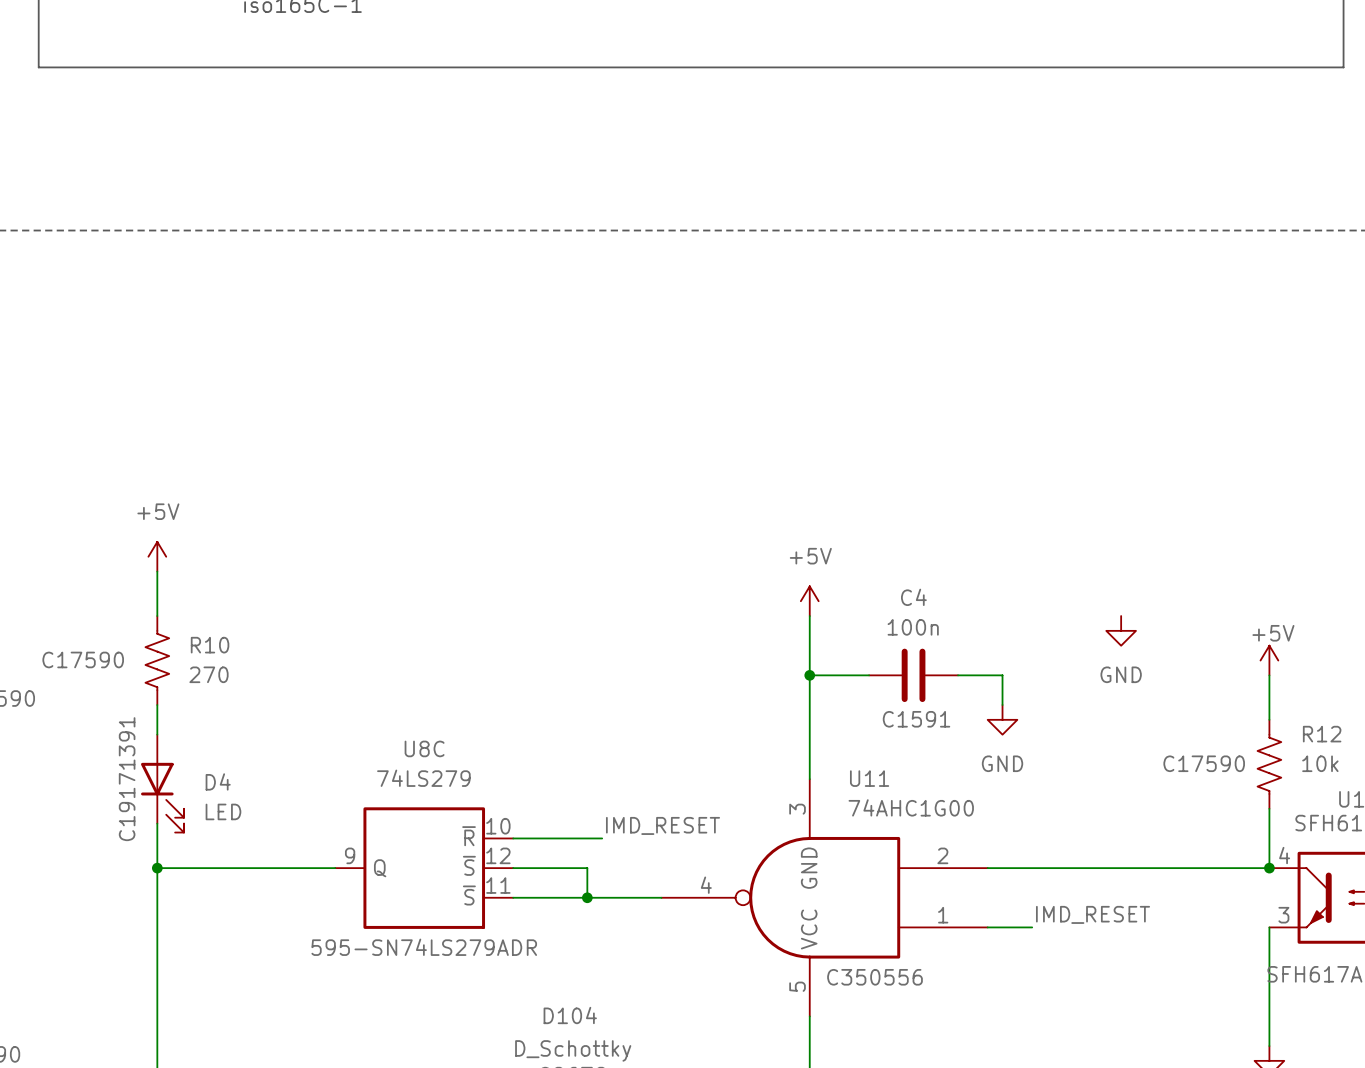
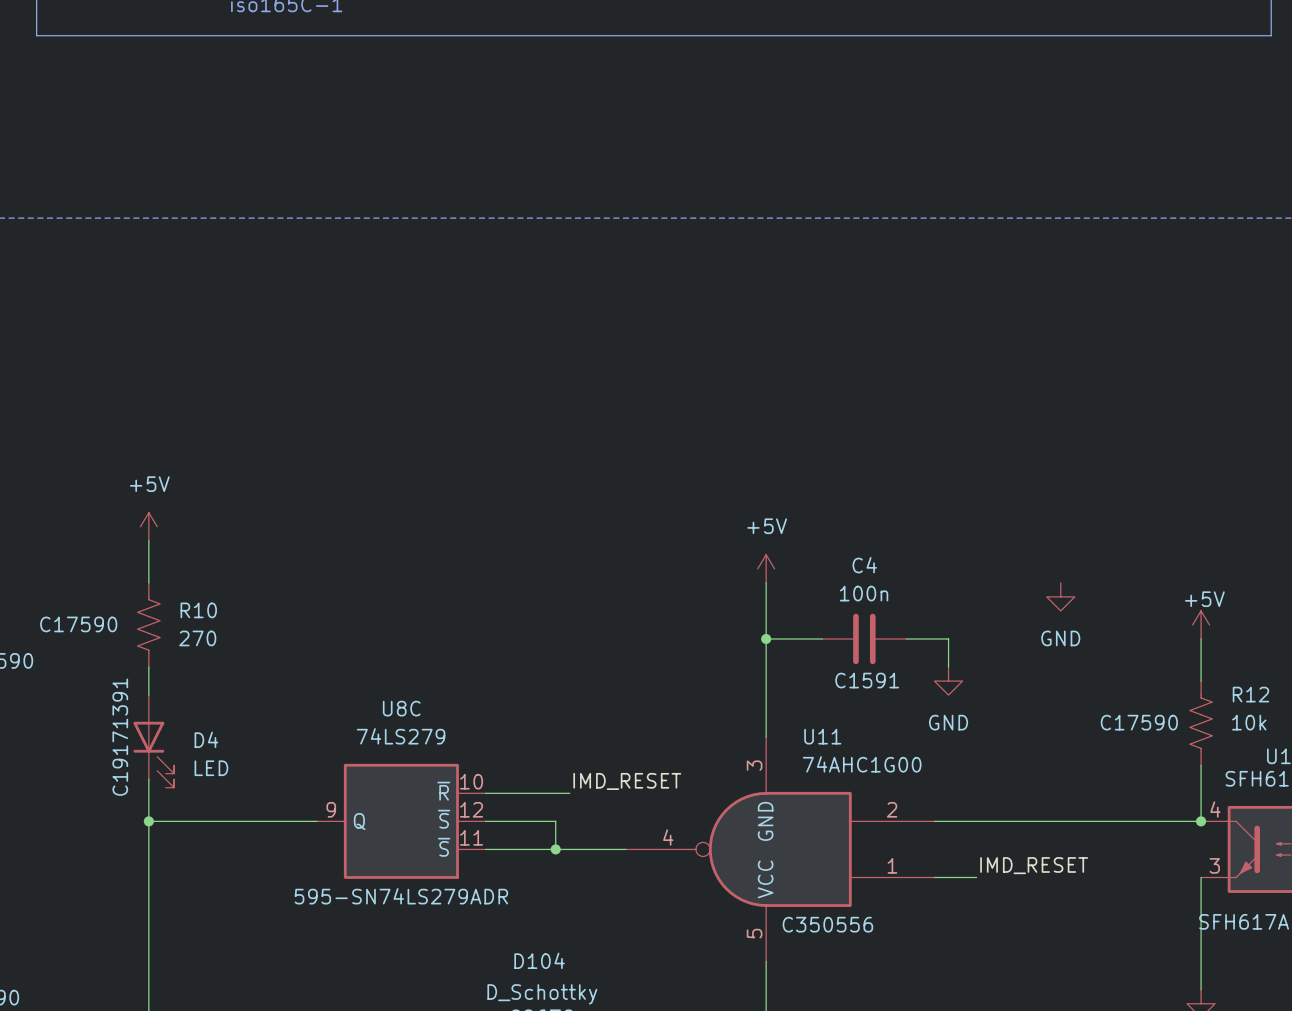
line: (38, 37) (38, 67) (1343, 67) (1343, 37) -> (36, 35) (1271, 35)

